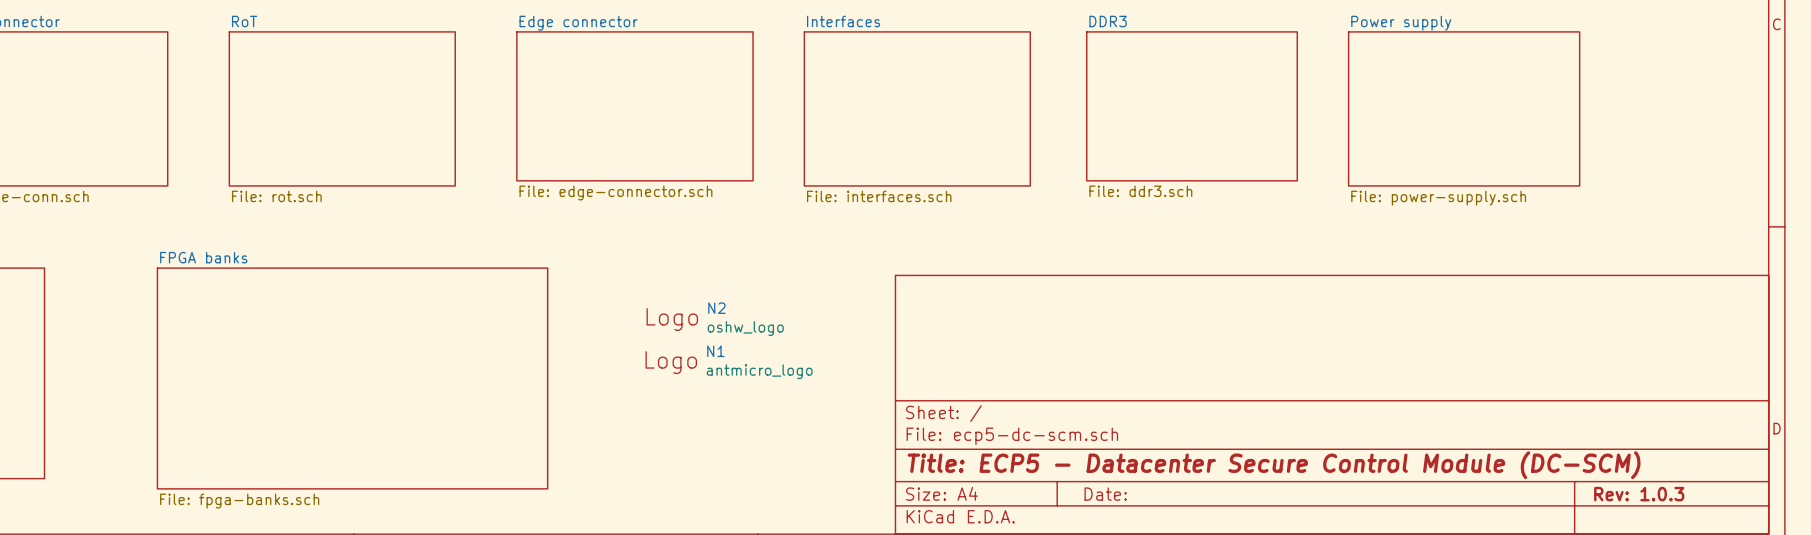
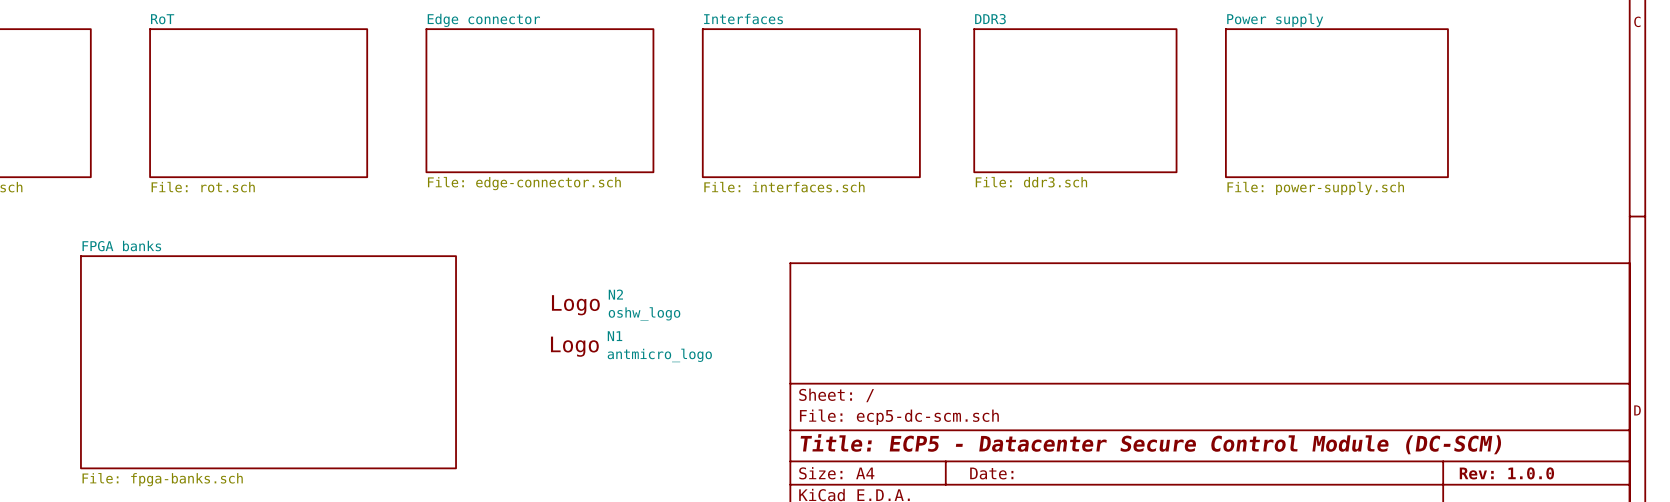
title block: Rev: 1.0.3 (1639, 494) -> Rev: 1.0.0 (1506, 473)

